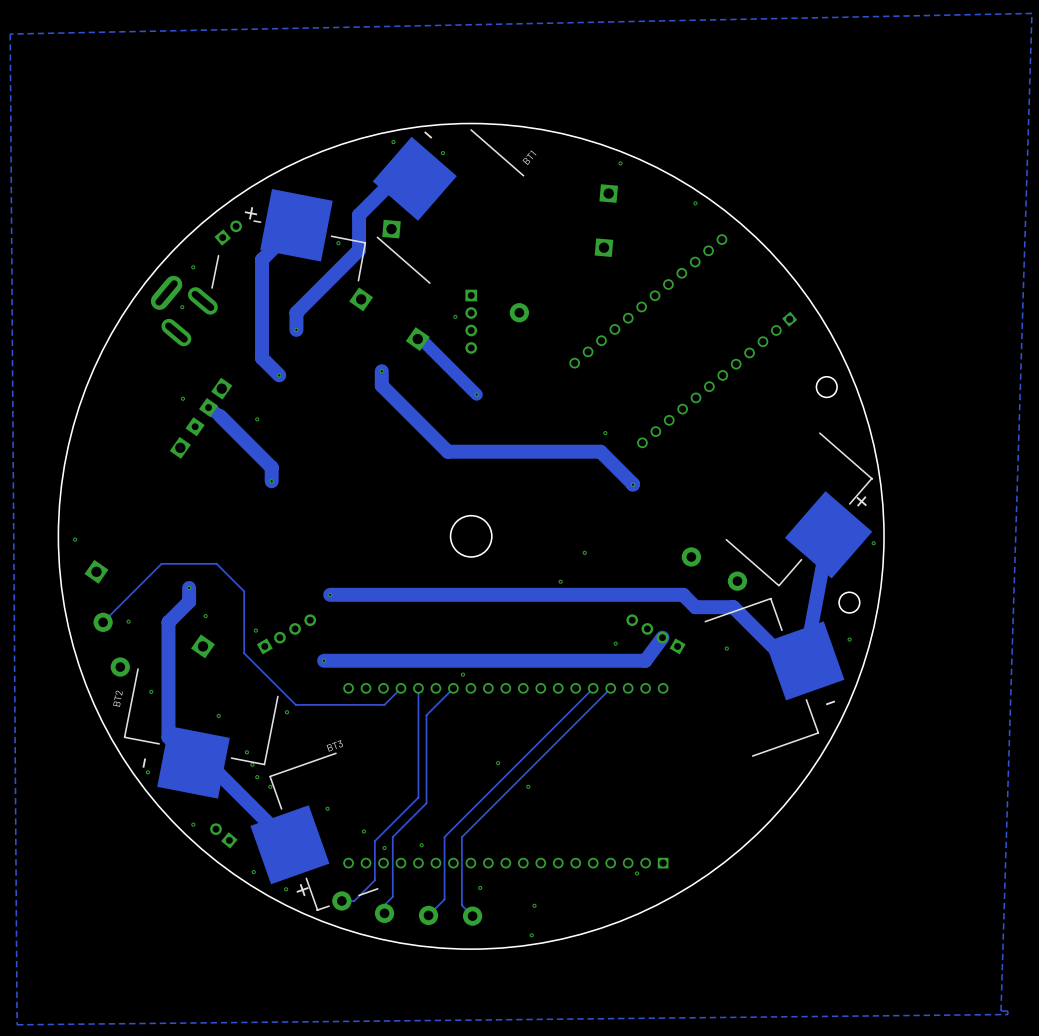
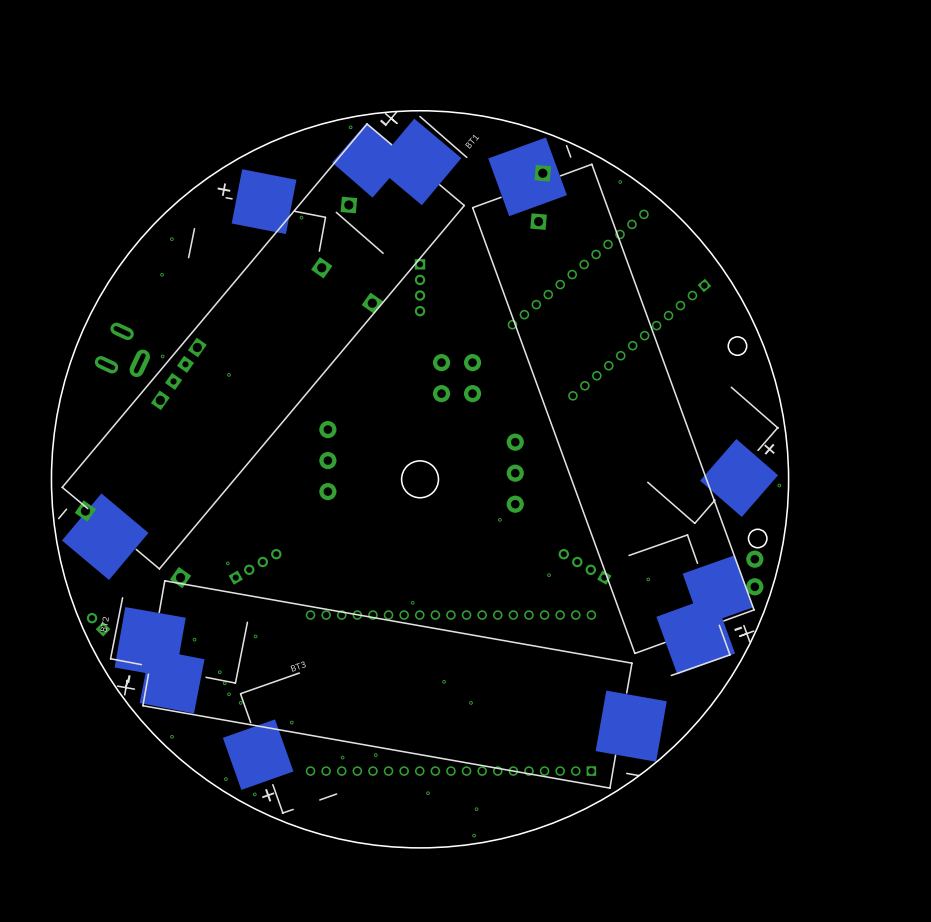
zone outline: (1031, 13) (1000, 1011) (1007, 1011) (1007, 1014) (17, 1024) (10, 34) (1031, 13) -> none
via: (443, 153) -> none
via: (620, 163) -> none
track: (414, 178) (395, 178) (359, 215) (359, 250) (296, 312) (296, 329) -> none
track: (296, 225) (262, 259) (262, 358) (279, 375) -> none
part: (228, 233) -> none
part: (184, 311) -> none
part: (519, 312) -> none
via: (455, 316) -> none
via: (296, 329) -> none
track: (417, 339) (421, 339) (476, 394) -> none
track: (381, 371) (381, 385) (447, 451) (600, 451) (632, 484) -> none
via: (381, 371) -> none
via: (279, 375) -> none
part: none -> (261, 345)
part: none -> (122, 349)
via: (476, 394) -> none
part: none -> (441, 362)
part: none -> (472, 362)
track: (208, 407) (220, 415) (271, 467) (271, 481) -> none
via: (605, 433) -> none
part: none -> (441, 393)
part: none -> (472, 393)
part: none -> (613, 406)
part: none -> (327, 429)
via: (271, 481) -> none
via: (632, 484) -> none
part: none -> (515, 442)
part: none -> (327, 460)
part: none -> (515, 473)
track: (828, 534) (804, 660) (787, 660) (733, 607) (695, 607) (683, 594) (330, 594) -> none
via: (75, 539) -> none
part: none -> (327, 491)
via: (584, 552) -> none
part: (691, 556) -> none
part: none -> (515, 504)
part: (737, 581) -> none
track: (189, 587) (189, 601) (168, 622) (168, 737) (193, 762) (207, 762) (289, 844) -> none
via: (189, 587) -> none
via: (330, 594) -> none
via: (205, 616) -> none
via: (128, 621) -> none
track: (103, 622) (161, 563) (216, 563) (244, 591) (244, 653) (295, 704) (384, 704) (400, 688) -> none
part: (103, 622) -> none
part: none -> (754, 559)
track: (662, 637) (645, 660) (324, 660) -> none
via: (849, 639) -> none
part: none -> (754, 586)
via: (324, 660) -> none
part: (120, 667) -> none
track: (418, 688) (418, 797) (374, 841) (374, 880) (354, 900) (341, 900) -> none
track: (453, 688) (426, 715) (426, 803) (392, 836) (392, 896) (384, 905) (384, 913) -> none
track: (593, 688) (444, 837) (444, 899) (428, 915) -> none
track: (610, 688) (461, 837) (461, 905) (472, 916) -> none
via: (151, 691) -> none
part: none -> (98, 624)
part: none -> (390, 684)
via: (147, 772) -> none
via: (363, 831) -> none
part: (223, 835) -> none
via: (637, 873) -> none
part: (341, 900) -> none
part: (384, 913) -> none
part: (428, 915) -> none
part: (472, 916) -> none

